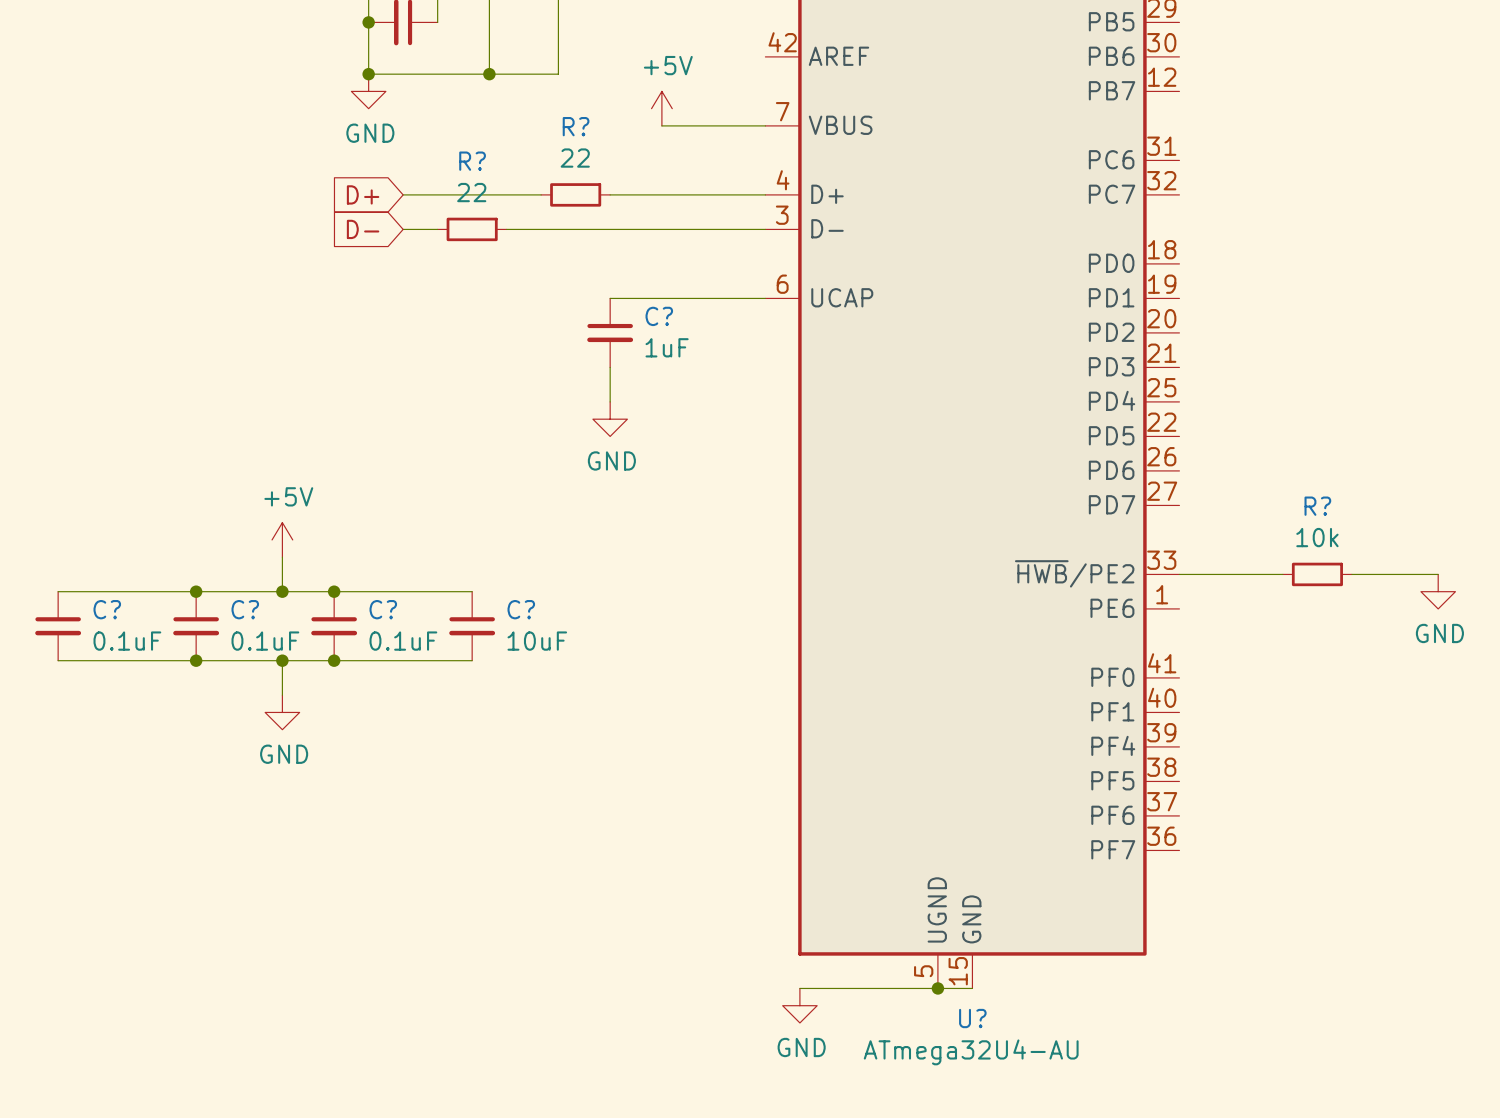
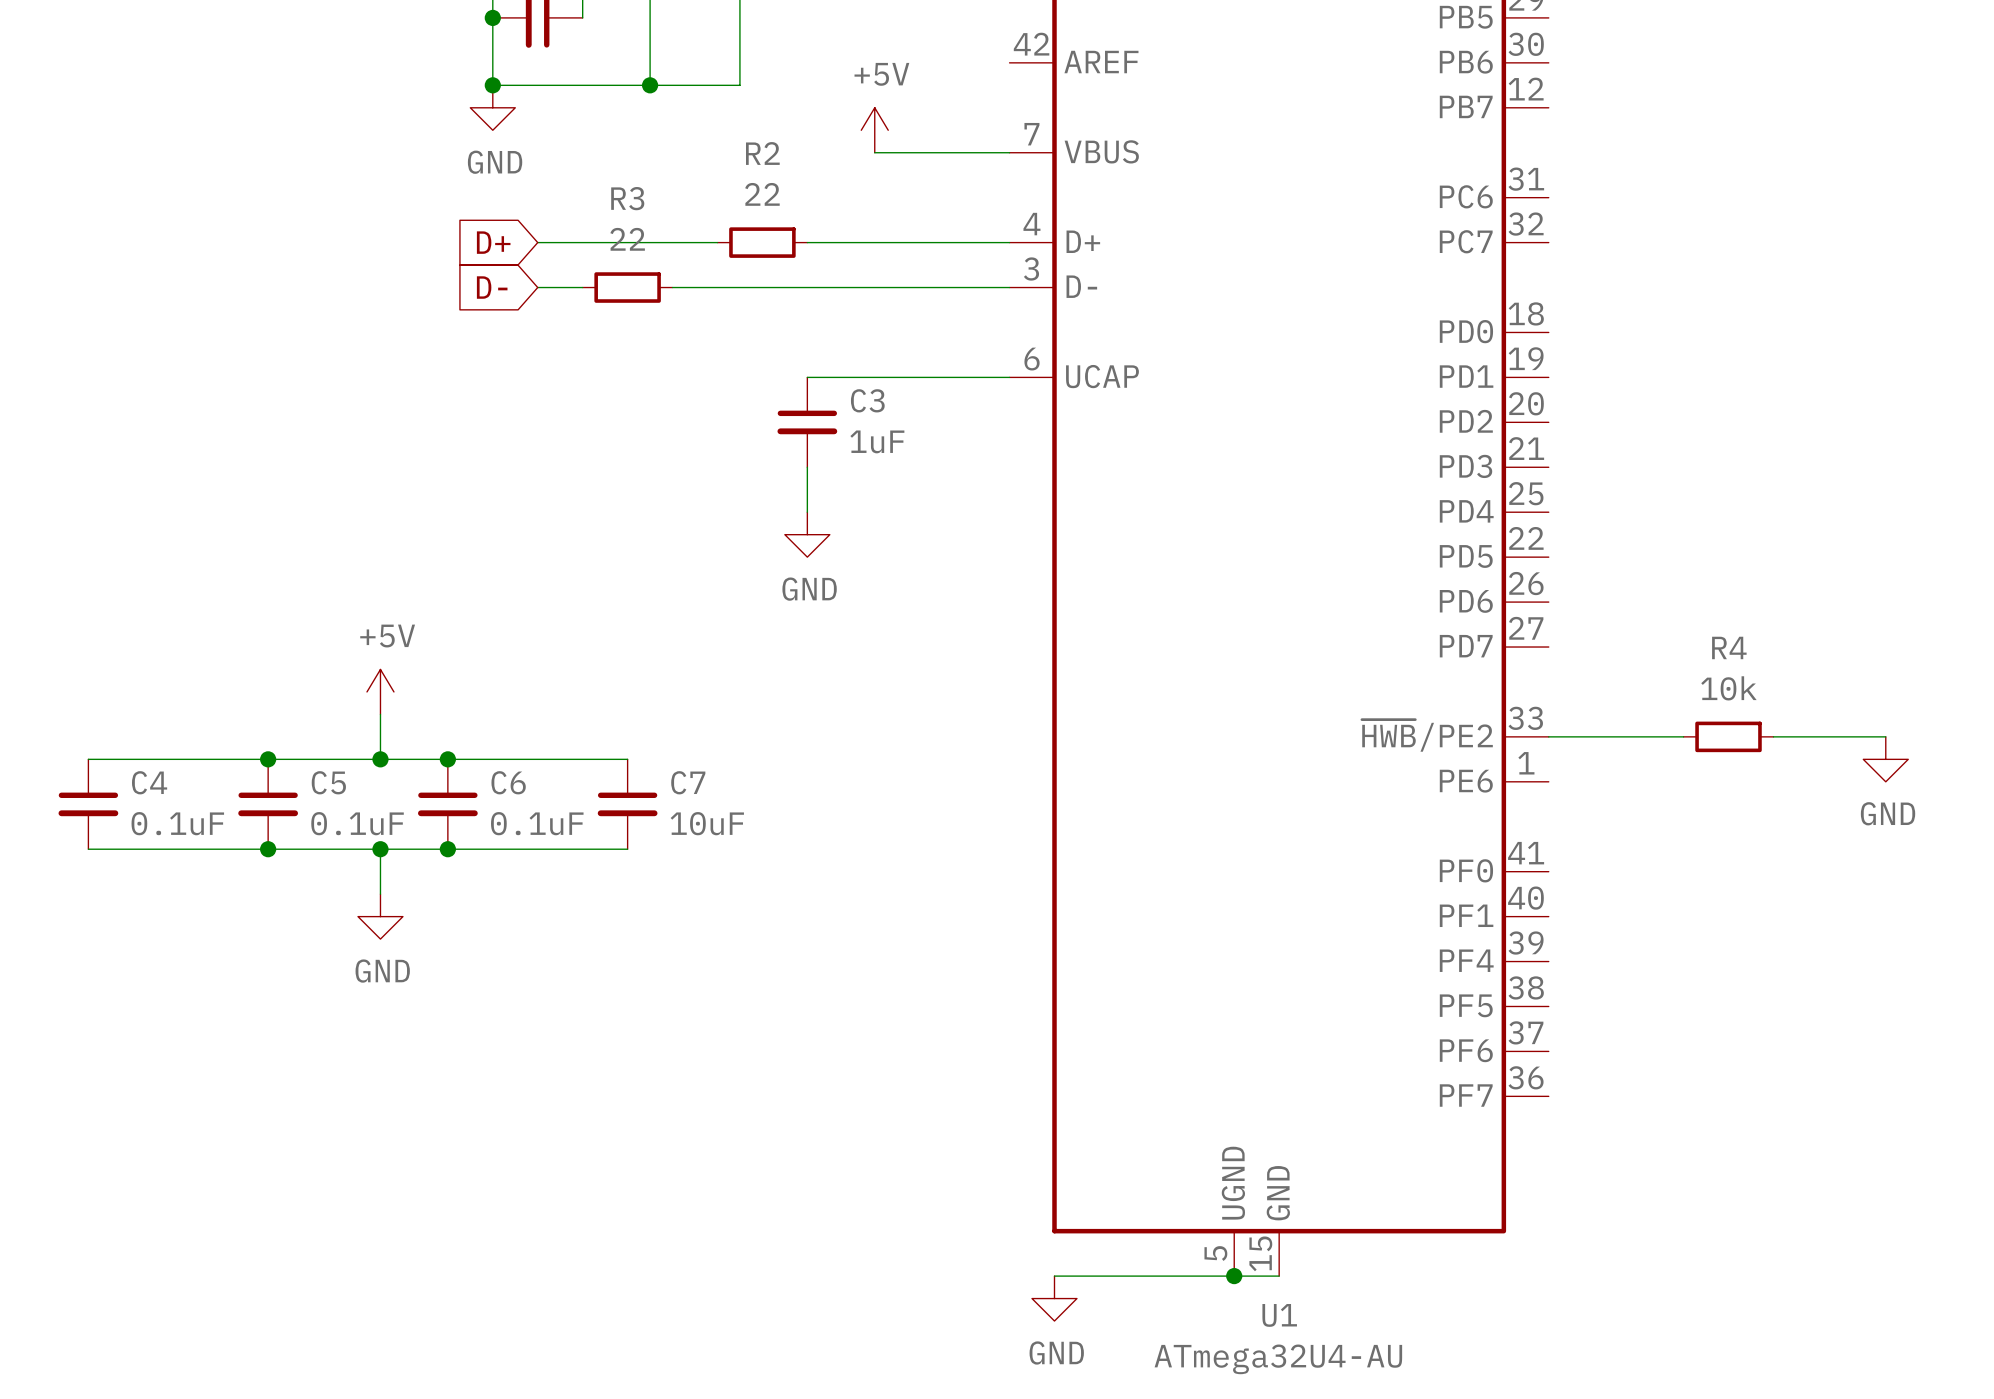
R? name: R? (576, 126) -> R2 (762, 153)
R? name: R? (472, 161) -> R3 (627, 198)
C? name: C? (659, 316) -> C3 (867, 400)
R? name: R? (1317, 506) -> R4 (1729, 647)
C? name: C? (107, 609) -> C4 (149, 782)
C? name: C? (245, 609) -> C5 (328, 782)
C? name: C? (383, 609) -> C6 (508, 782)
C? name: C? (521, 609) -> C7 (688, 782)
U? name: U? (972, 1018) -> U1 (1279, 1315)

